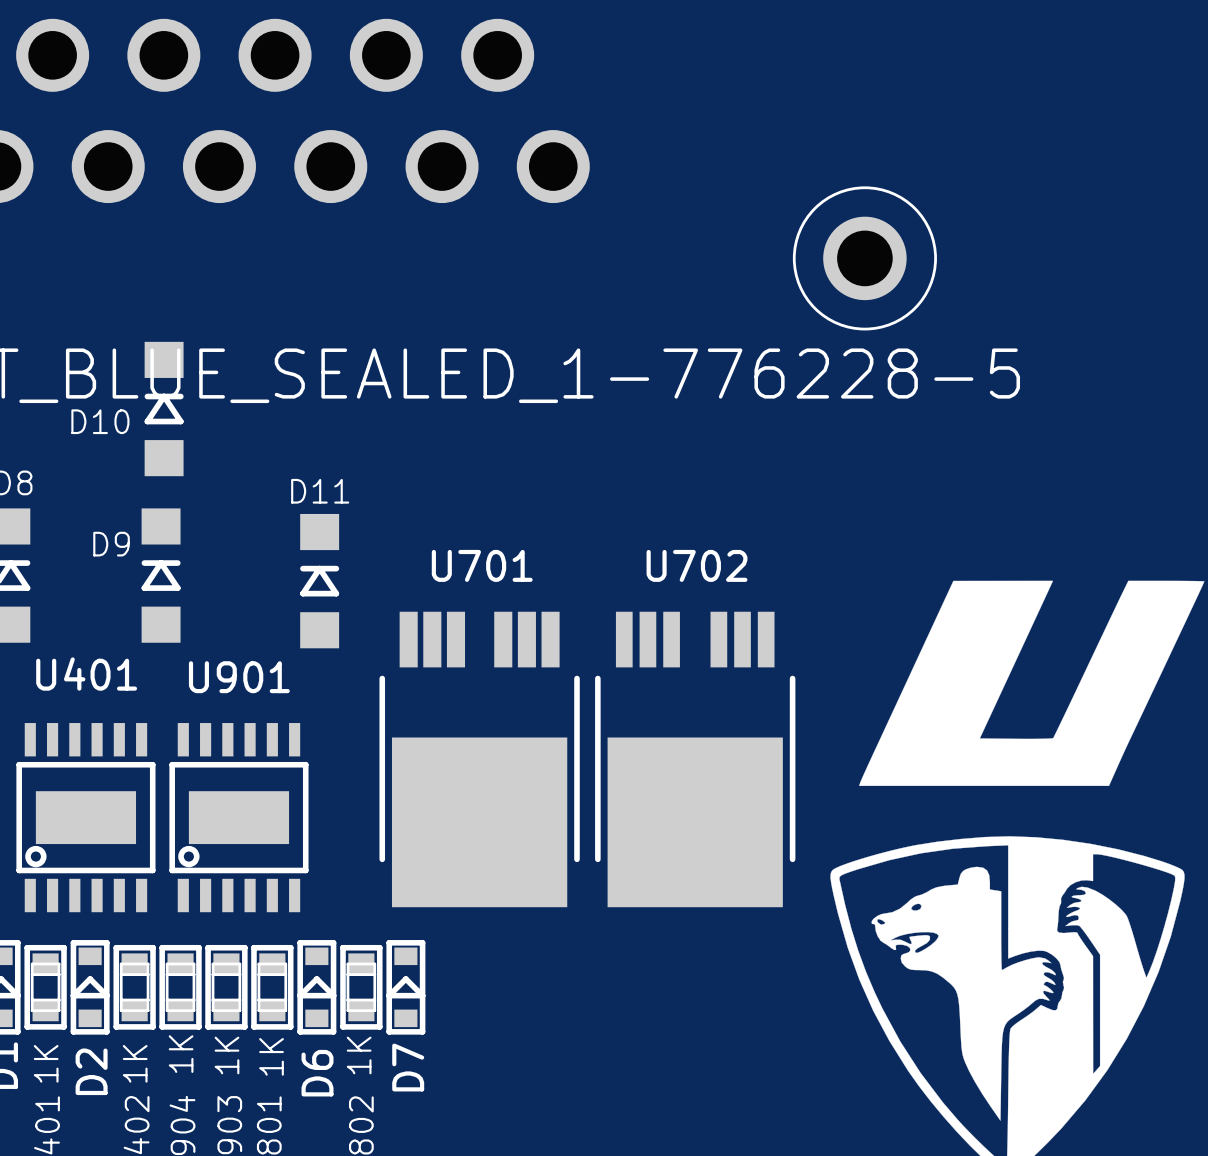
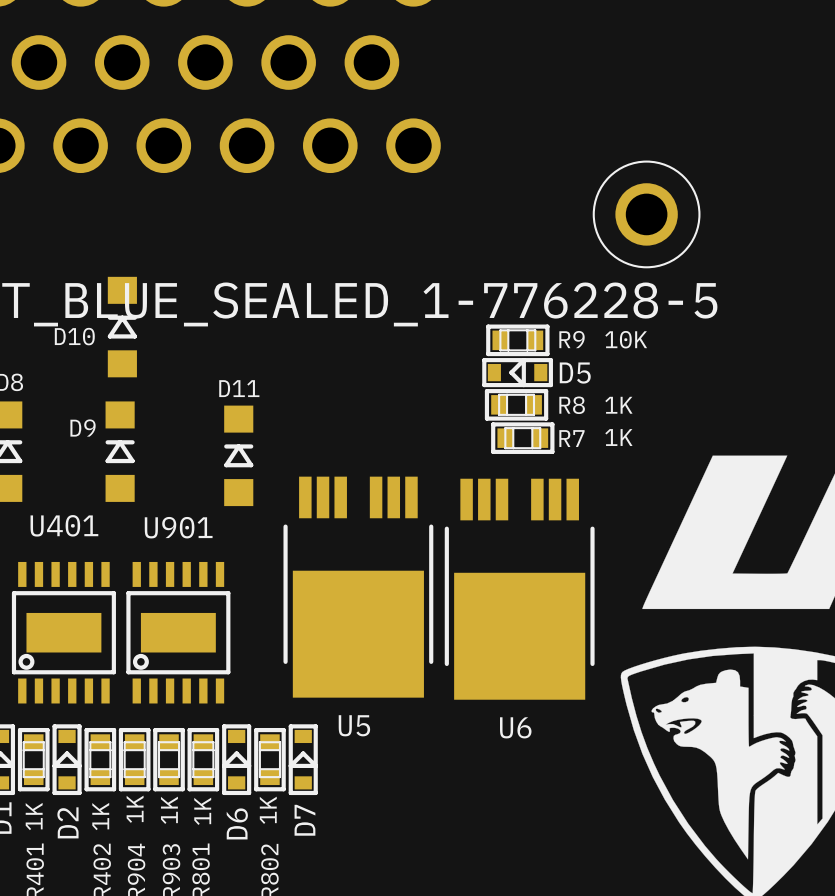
R9: none -> 10K (517, 340)
D5: none -> (517, 372)
R8: none -> 1K (516, 404)
R7: none -> 1K (522, 438)
U702 name: U702 (697, 565) -> U6 (515, 727)
U5: none -> (358, 587)
U701: (479, 759) -> none

